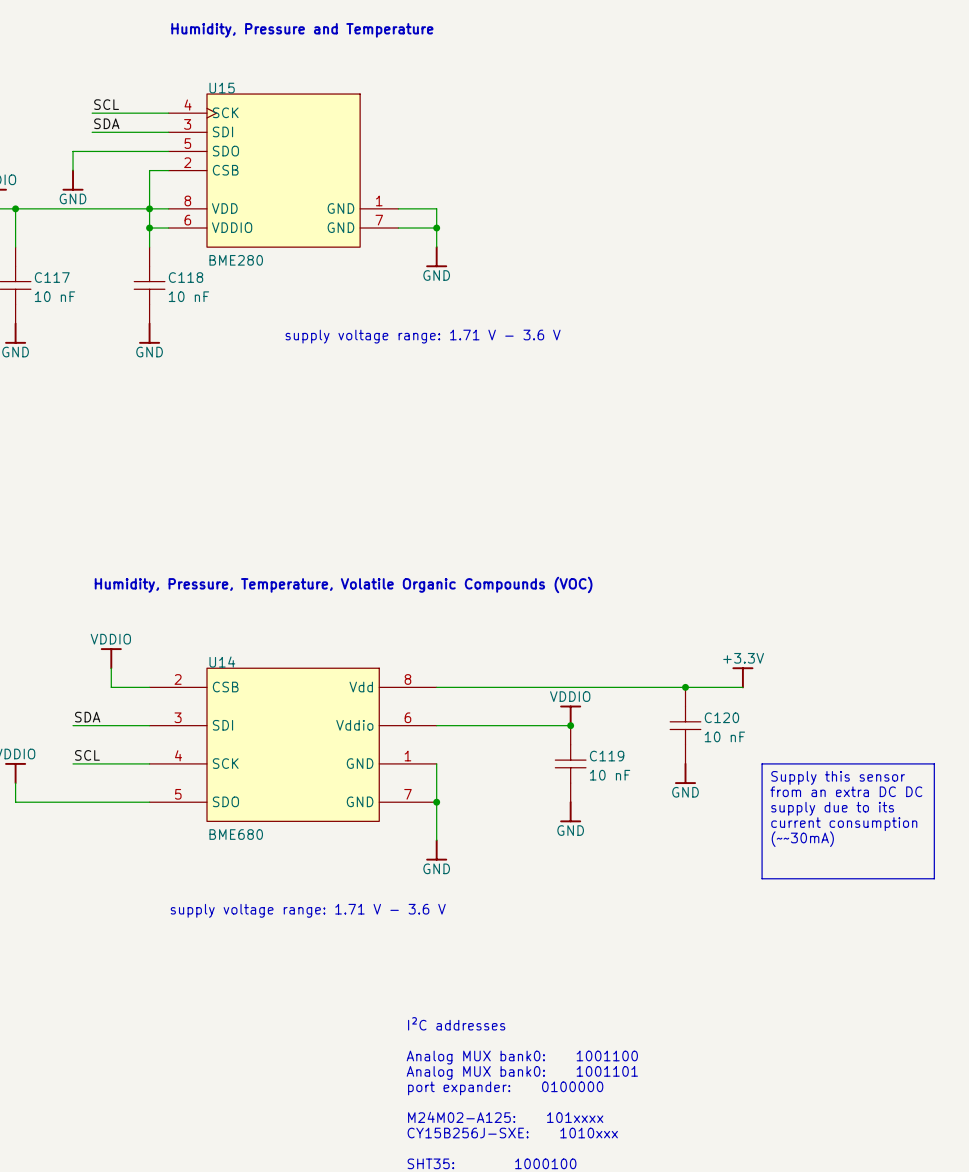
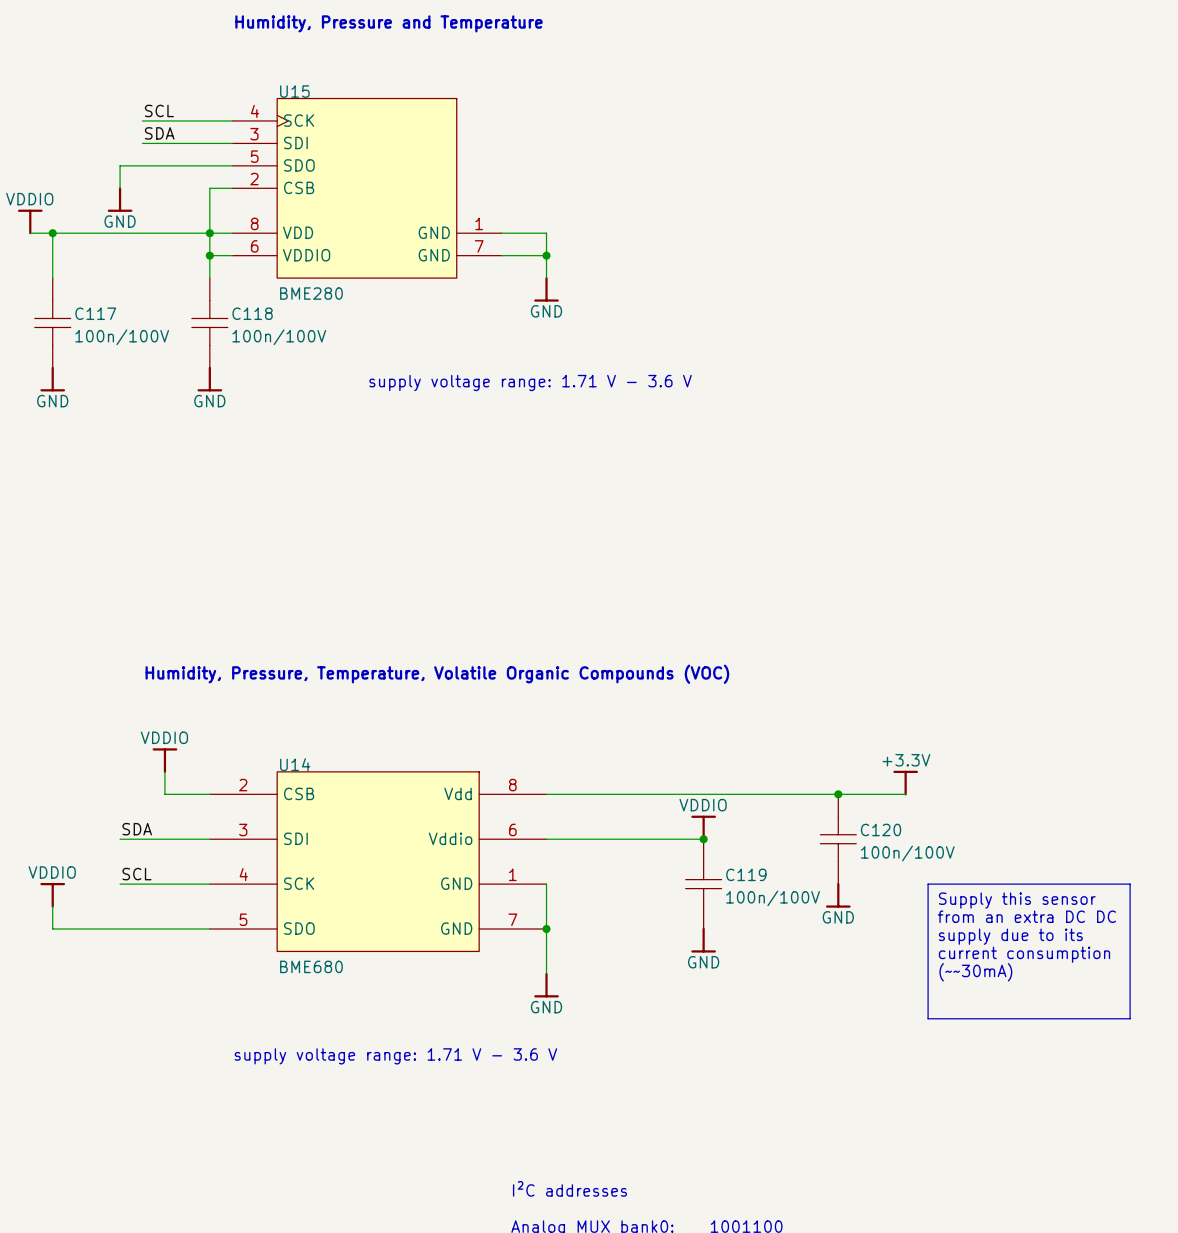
C117 value: 10 nF (54, 296) -> 100n/100V (122, 337)
C118 value: 10 nF (188, 296) -> 100n/100V (279, 337)
C120 value: 10 nF (724, 736) -> 100n/100V (907, 853)
C119 value: 10 nF (610, 775) -> 100n/100V (773, 898)

